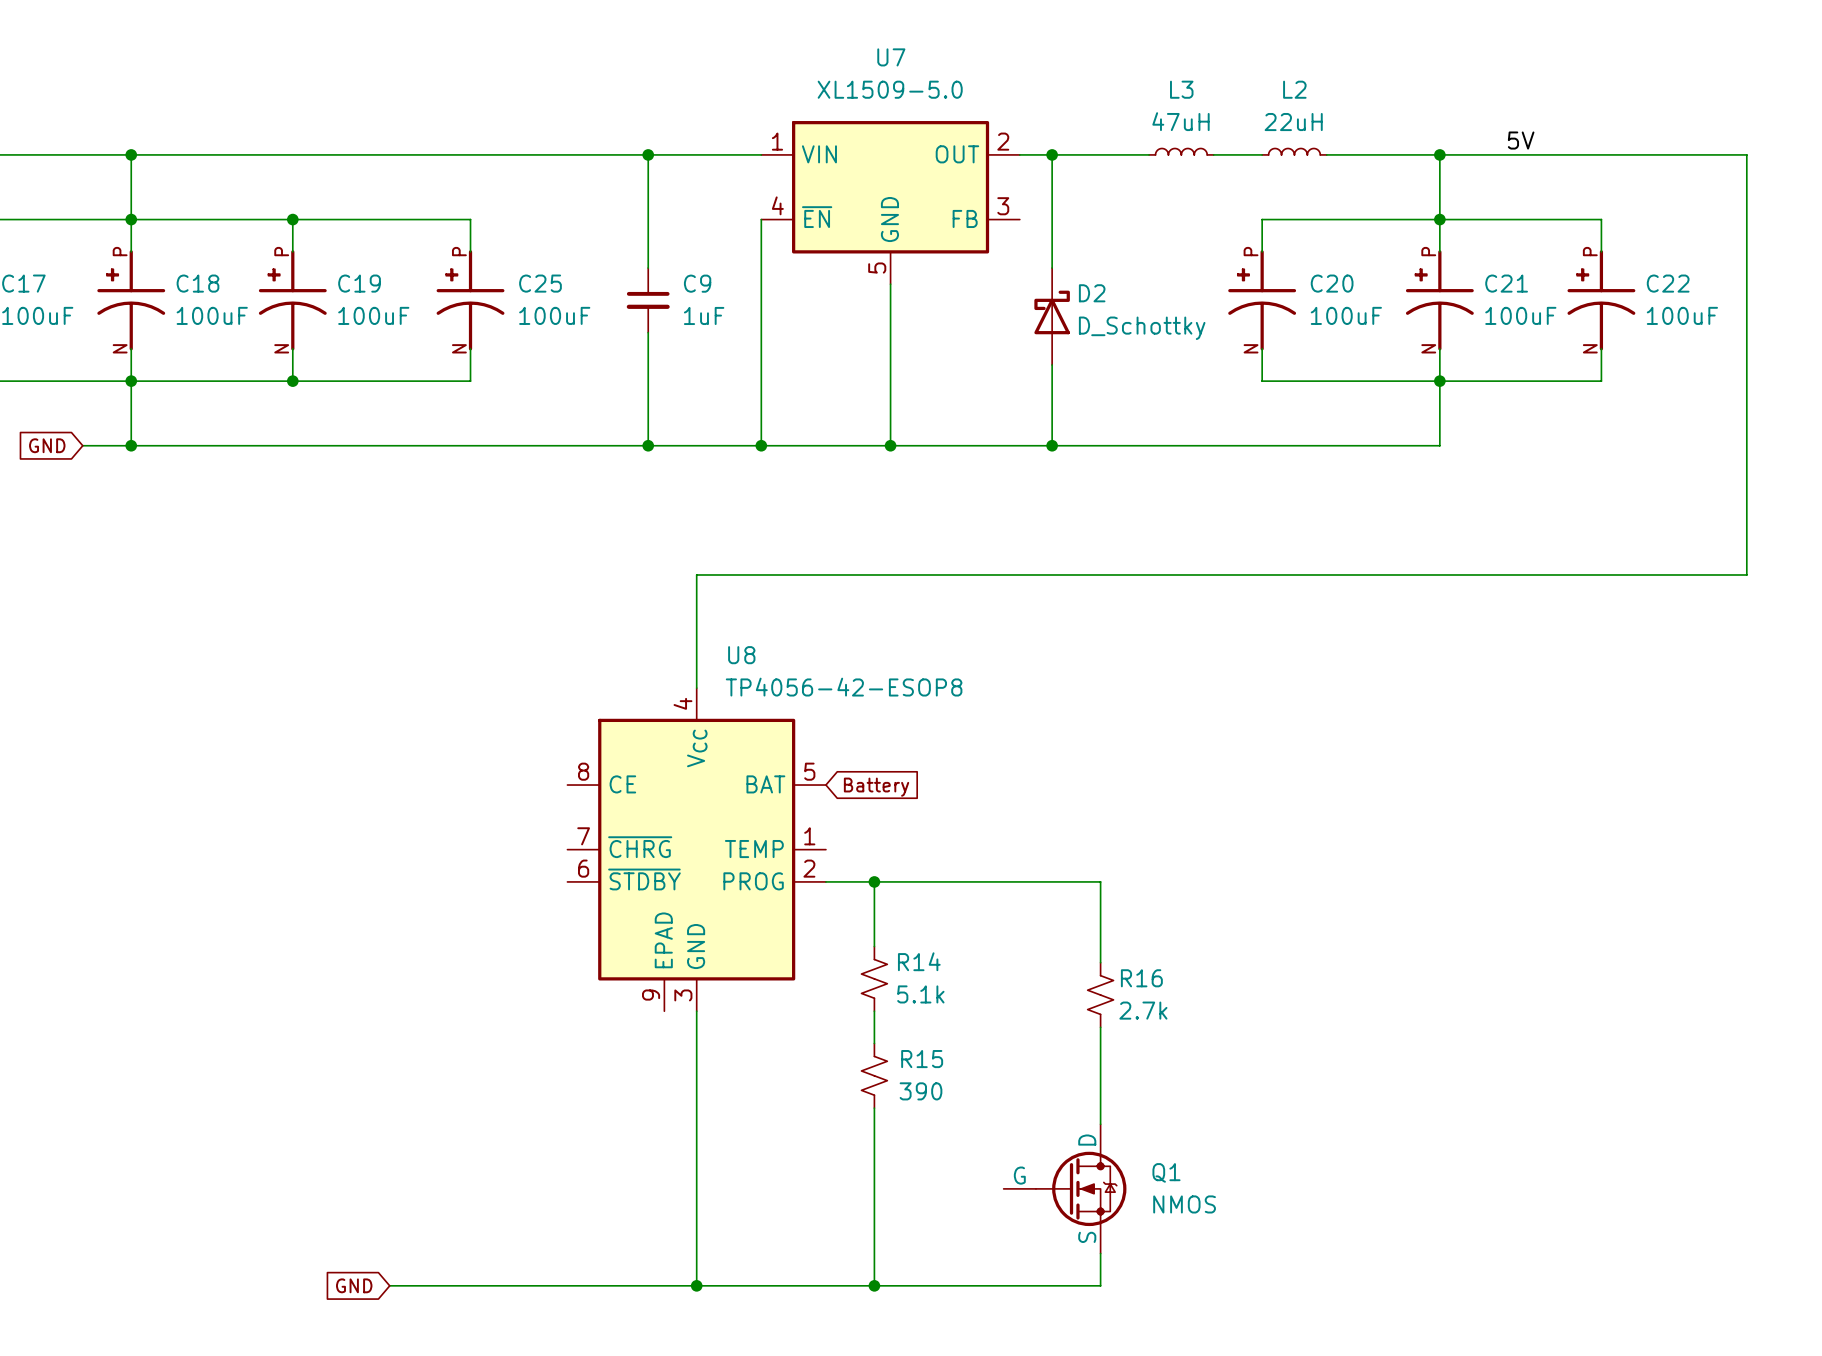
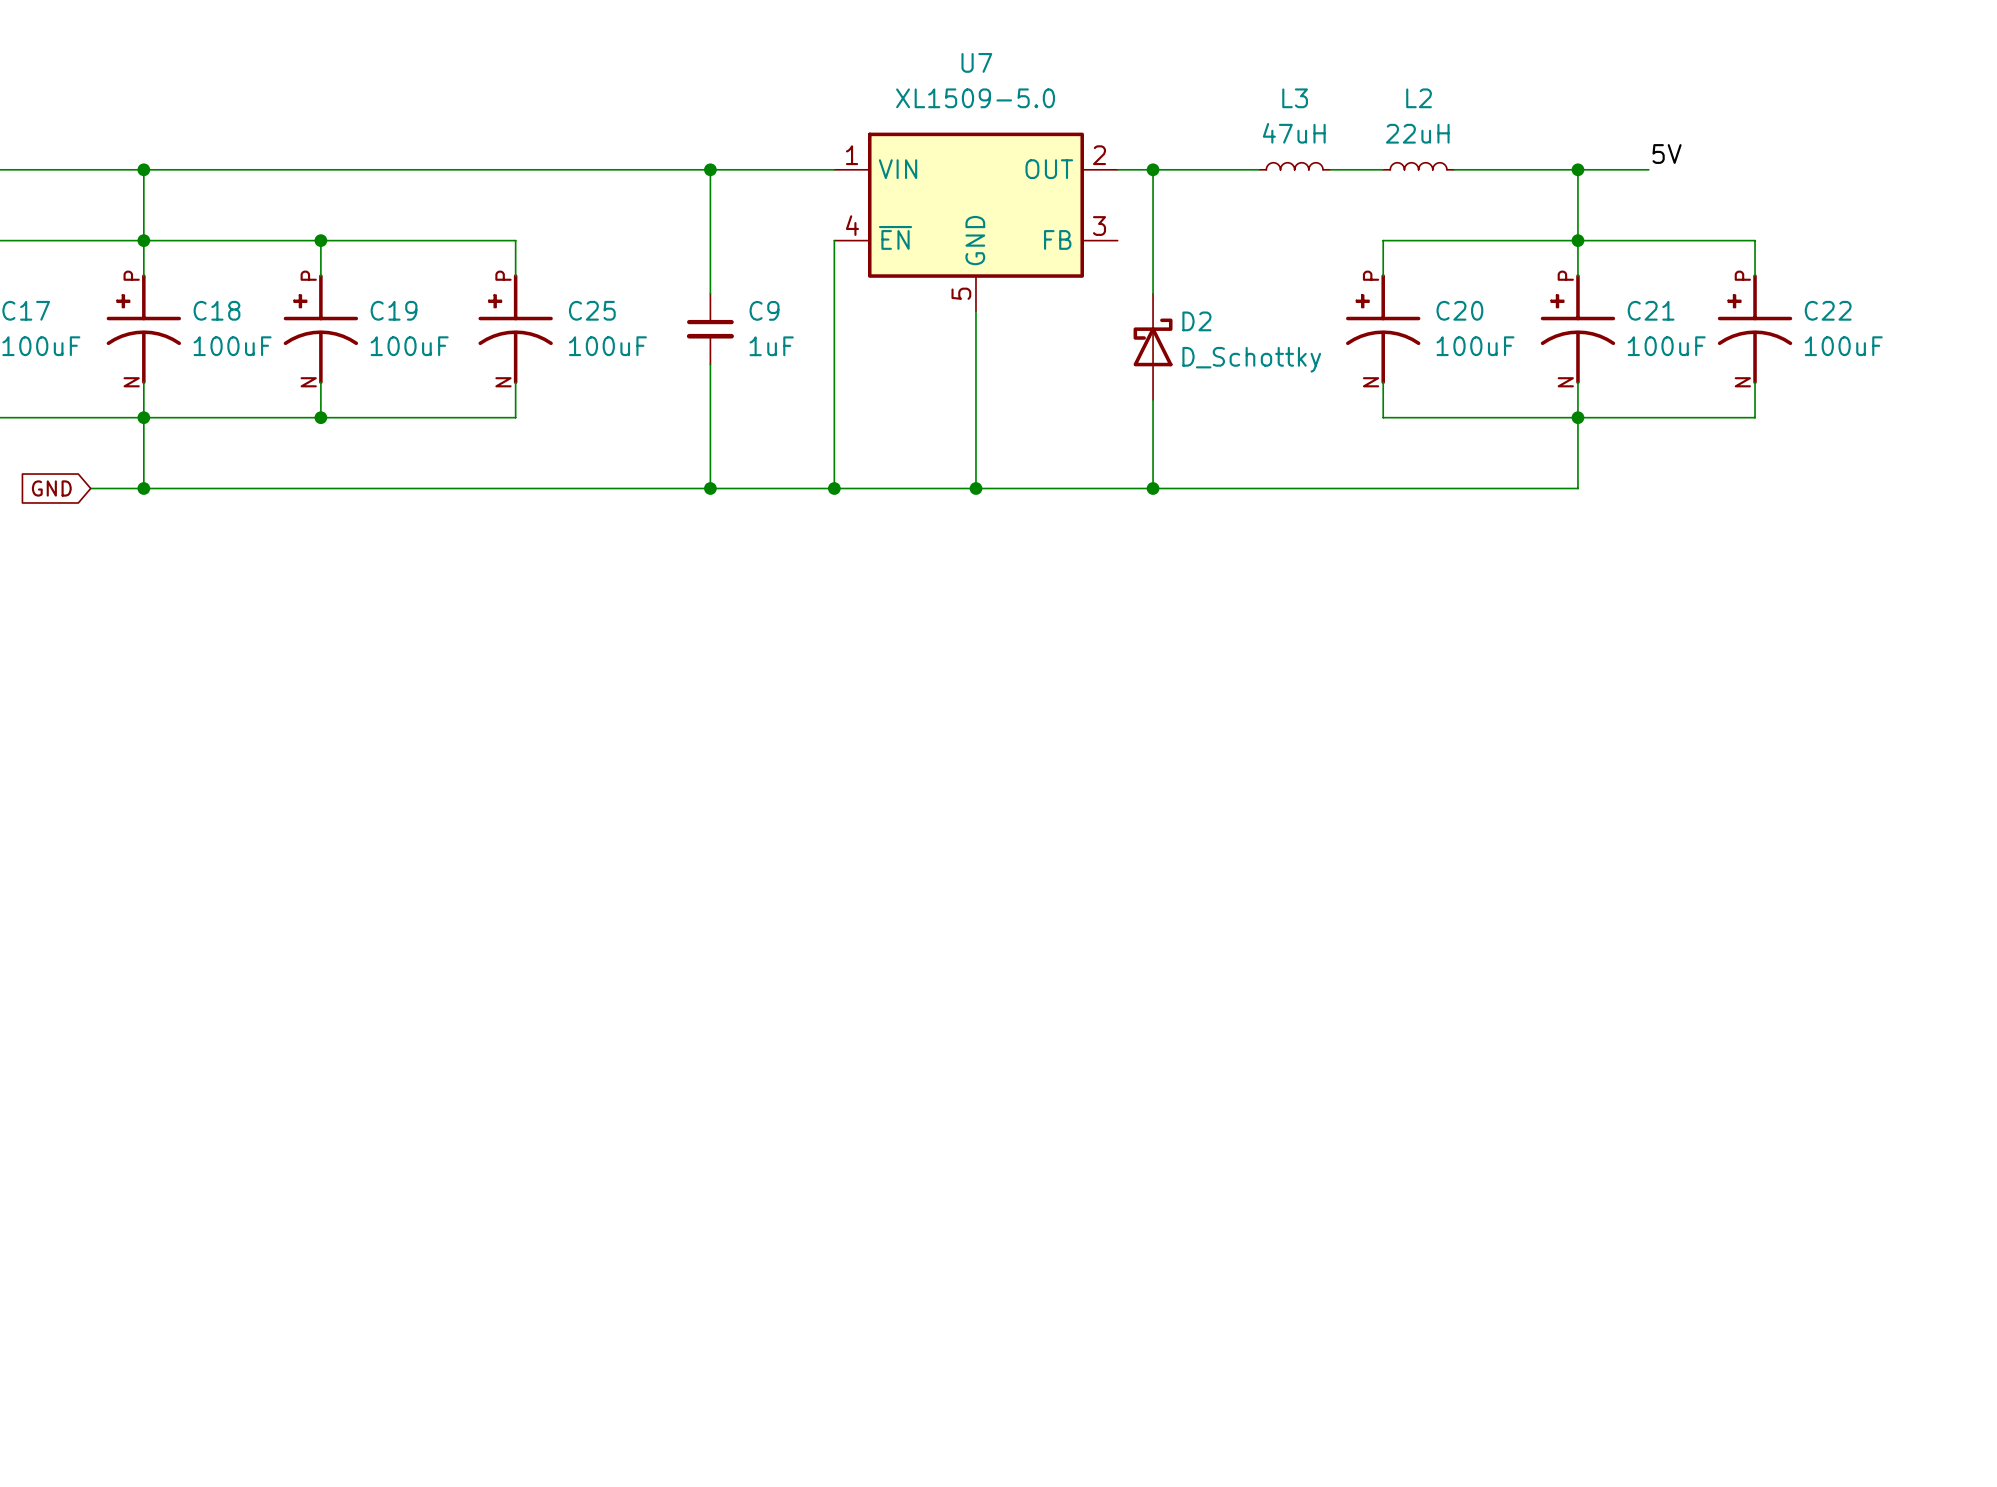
wire: (1504, 154) (1746, 154) (1746, 574) (696, 574) (696, 688) -> none
global label: Battery (876, 787) -> none
U8: TP4056-42-ESOP8 (696, 849) -> none
wire: (825, 881) (1100, 881) (1100, 962) -> none
wire: (874, 881) (874, 946) -> none
junction: (874, 881) -> none
R14: 5.1k (874, 978) -> none
R16: 2.7k (1100, 995) -> none
wire: (696, 1011) (696, 1285) -> none
wire: (874, 1011) (874, 1043) -> none
wire: (1100, 1027) (1100, 1124) -> none
R15: 390 (874, 1075) -> none
wire: (874, 1108) (874, 1285) -> none
Q1: NMOS (1065, 1188) -> none
wire: (1100, 1253) (1100, 1285) (389, 1285) -> none
global label: GND (354, 1285) -> none
junction: (696, 1285) -> none
junction: (874, 1285) -> none

